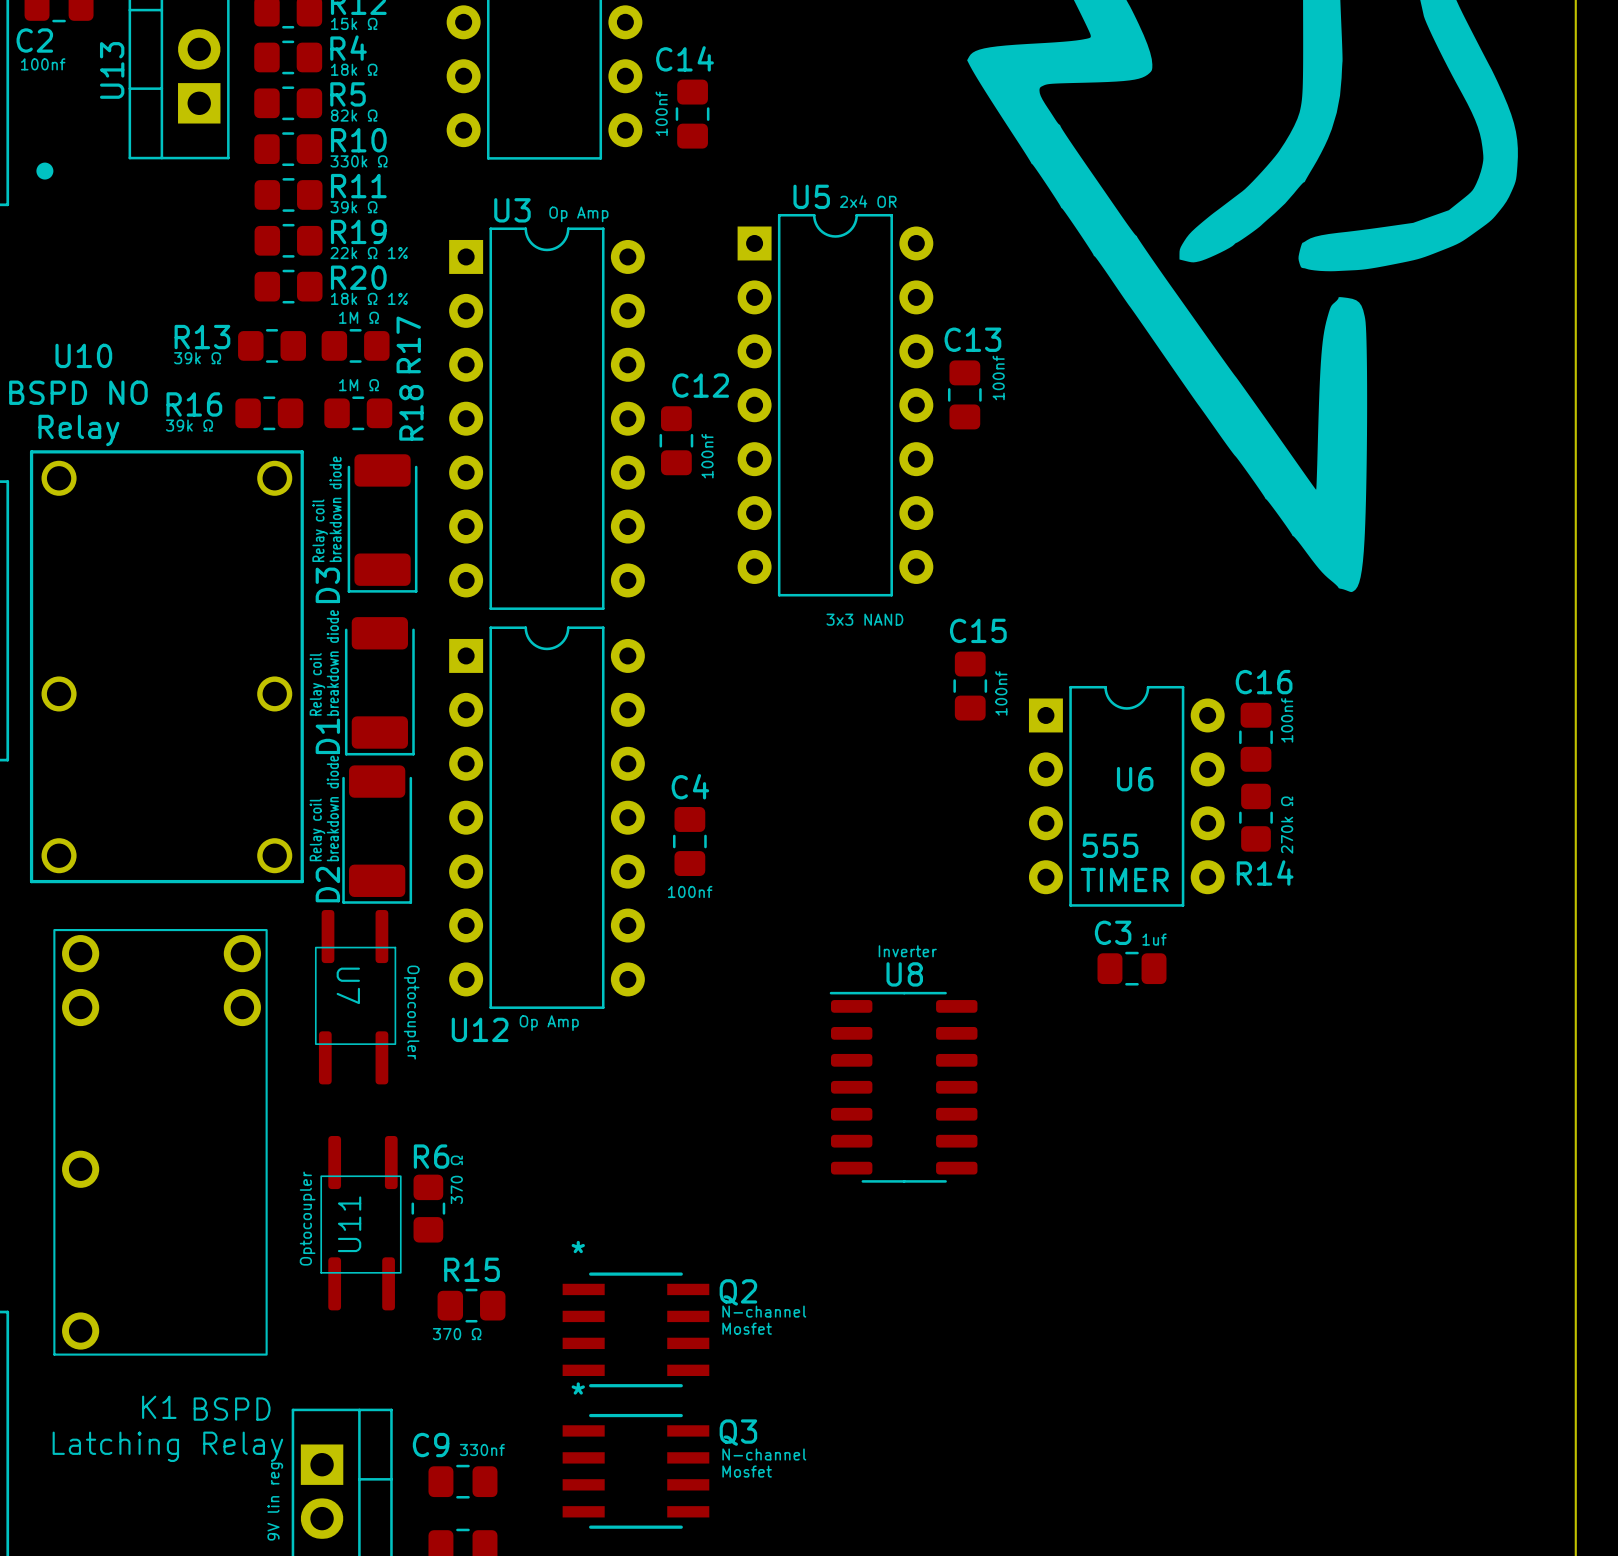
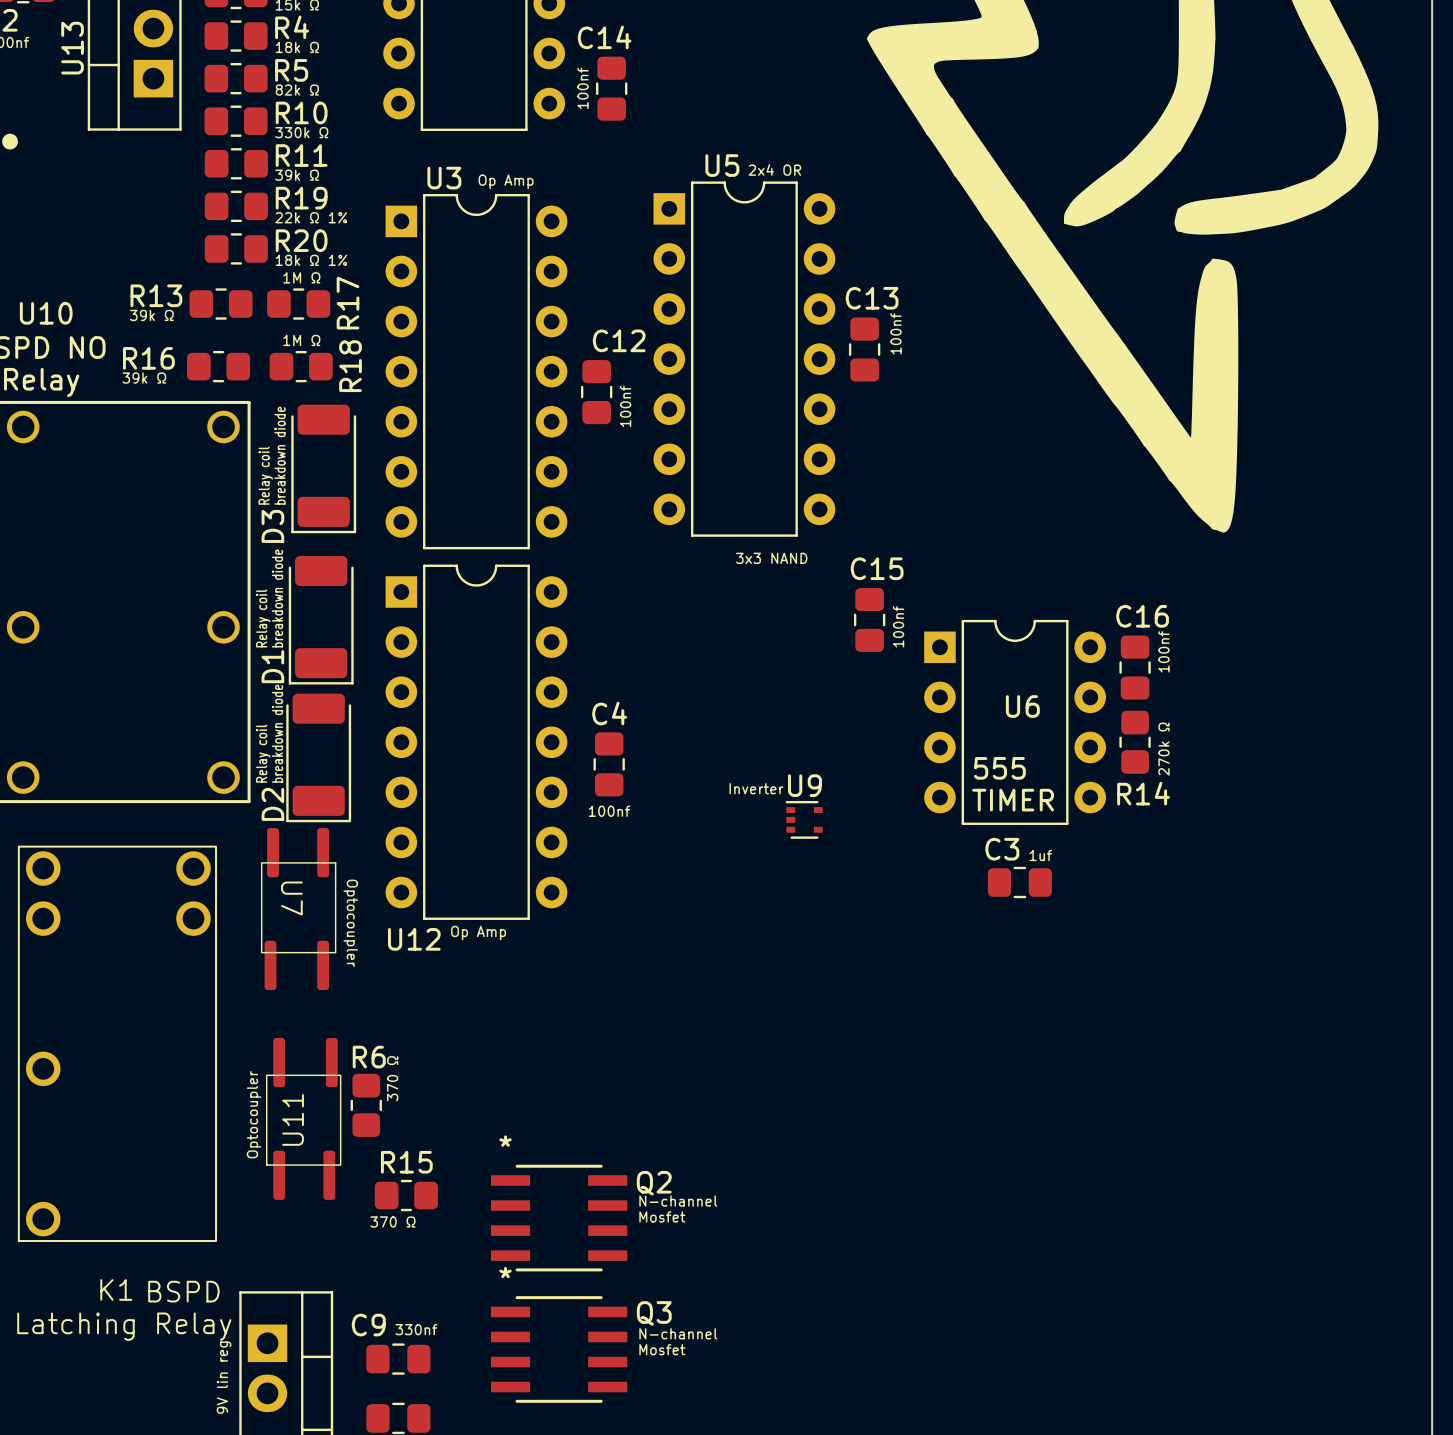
U9: none -> (804, 819)
text position: Inverter (907, 951) -> Inverter (756, 788)
U8: (903, 1087) -> none

